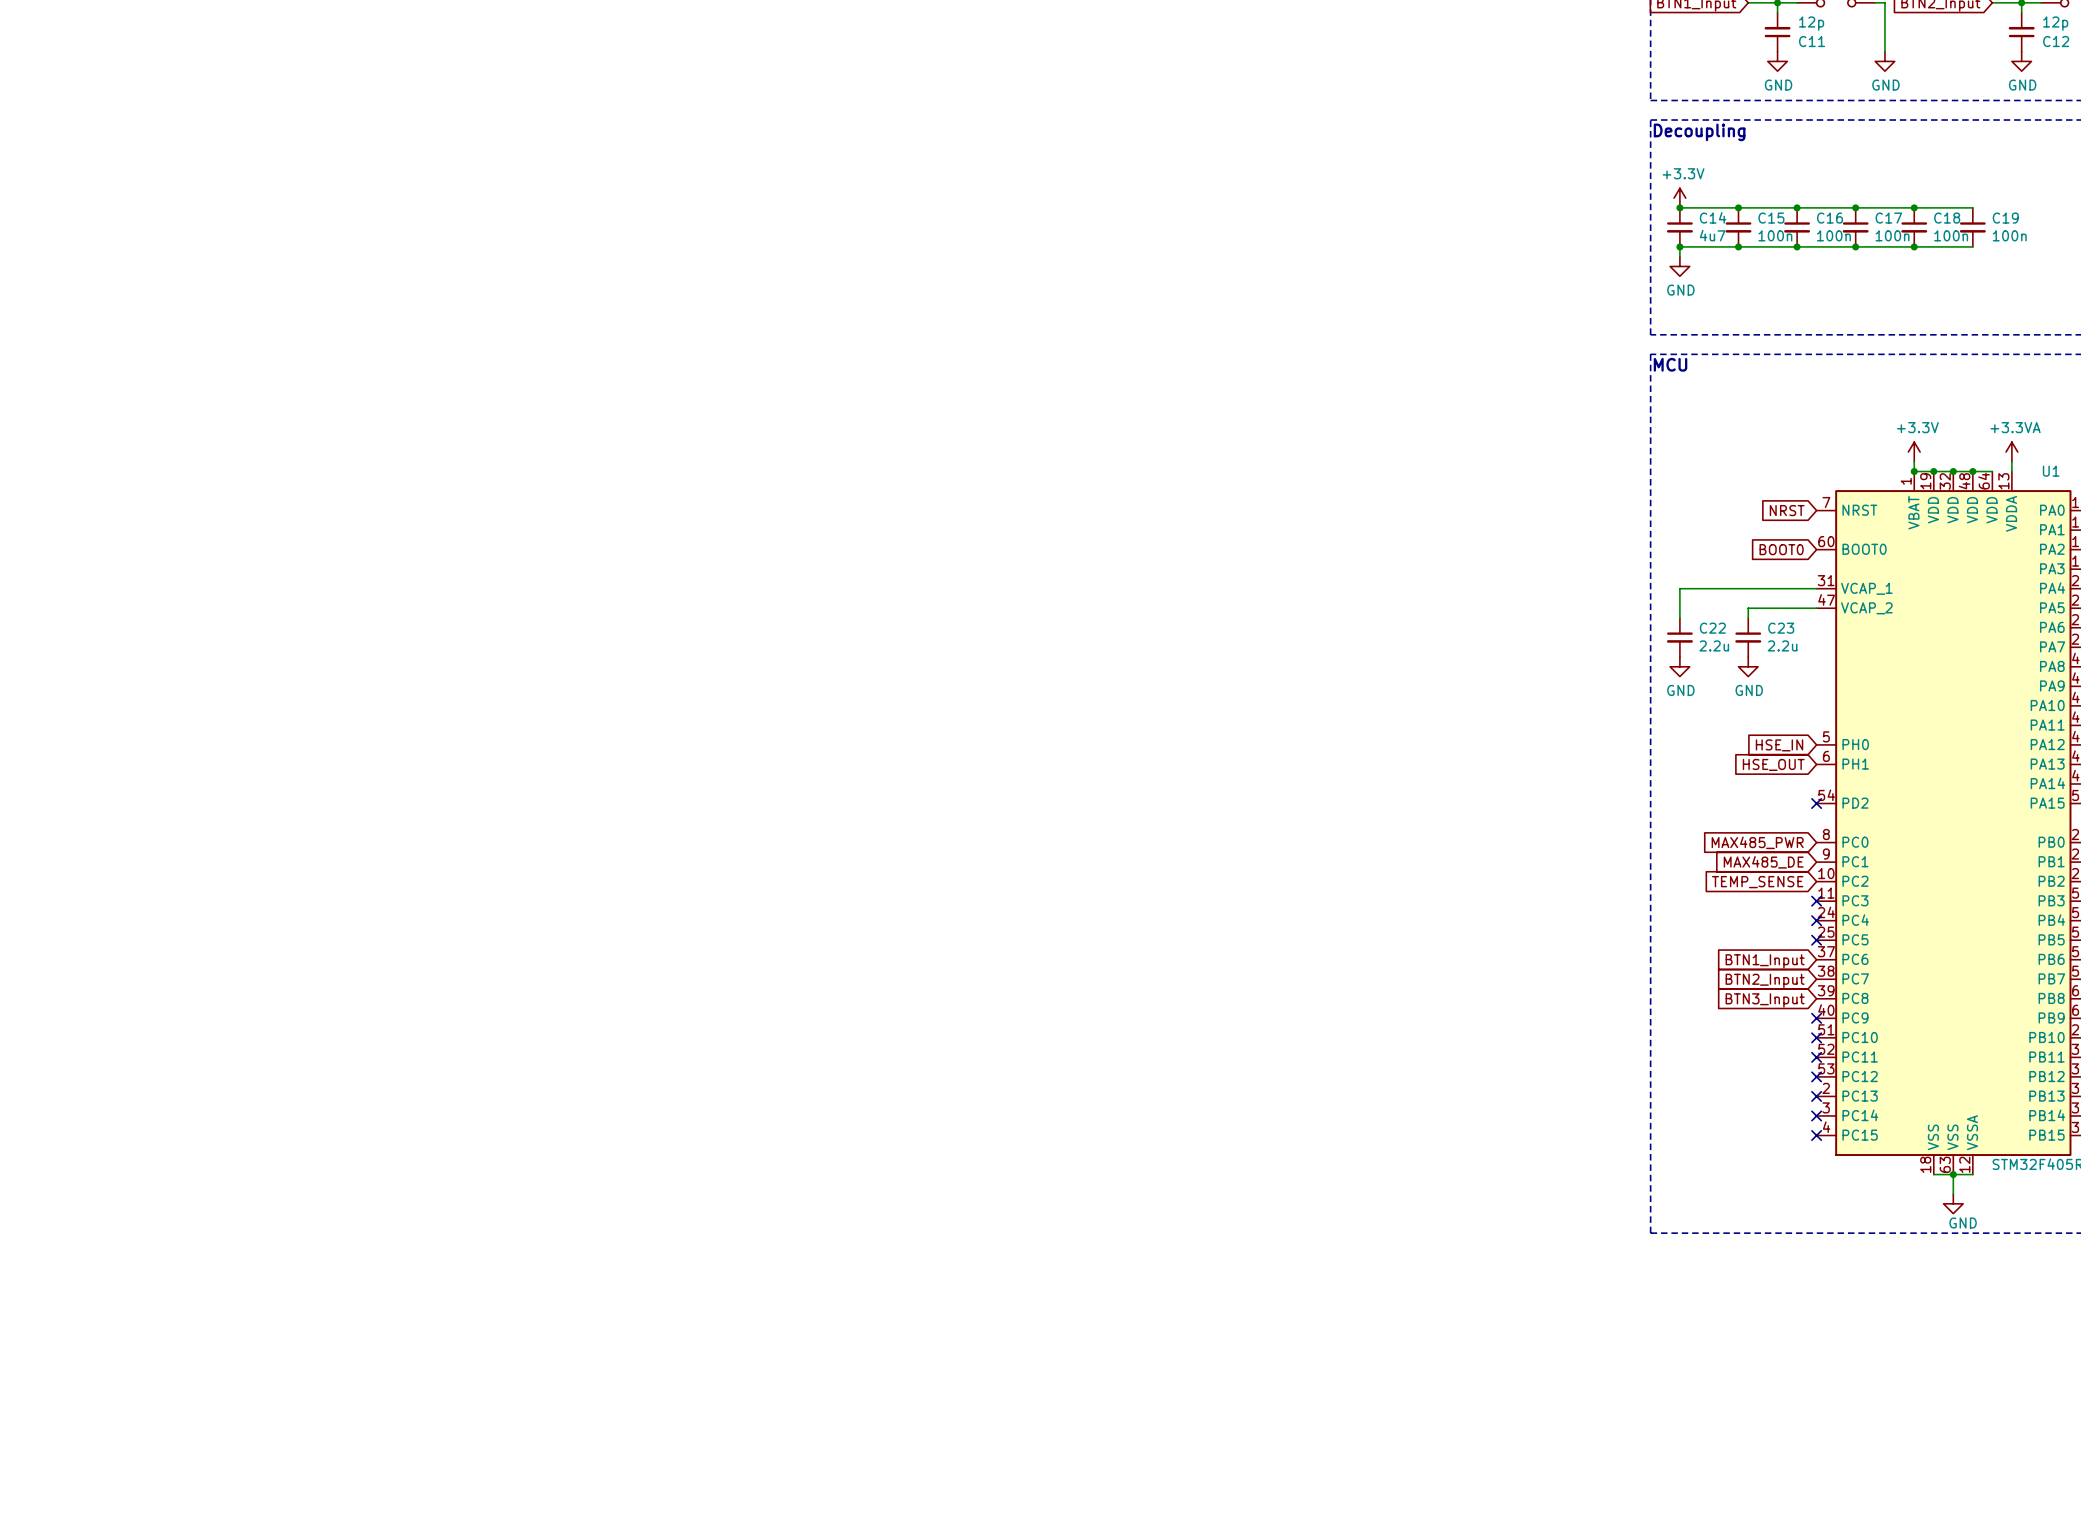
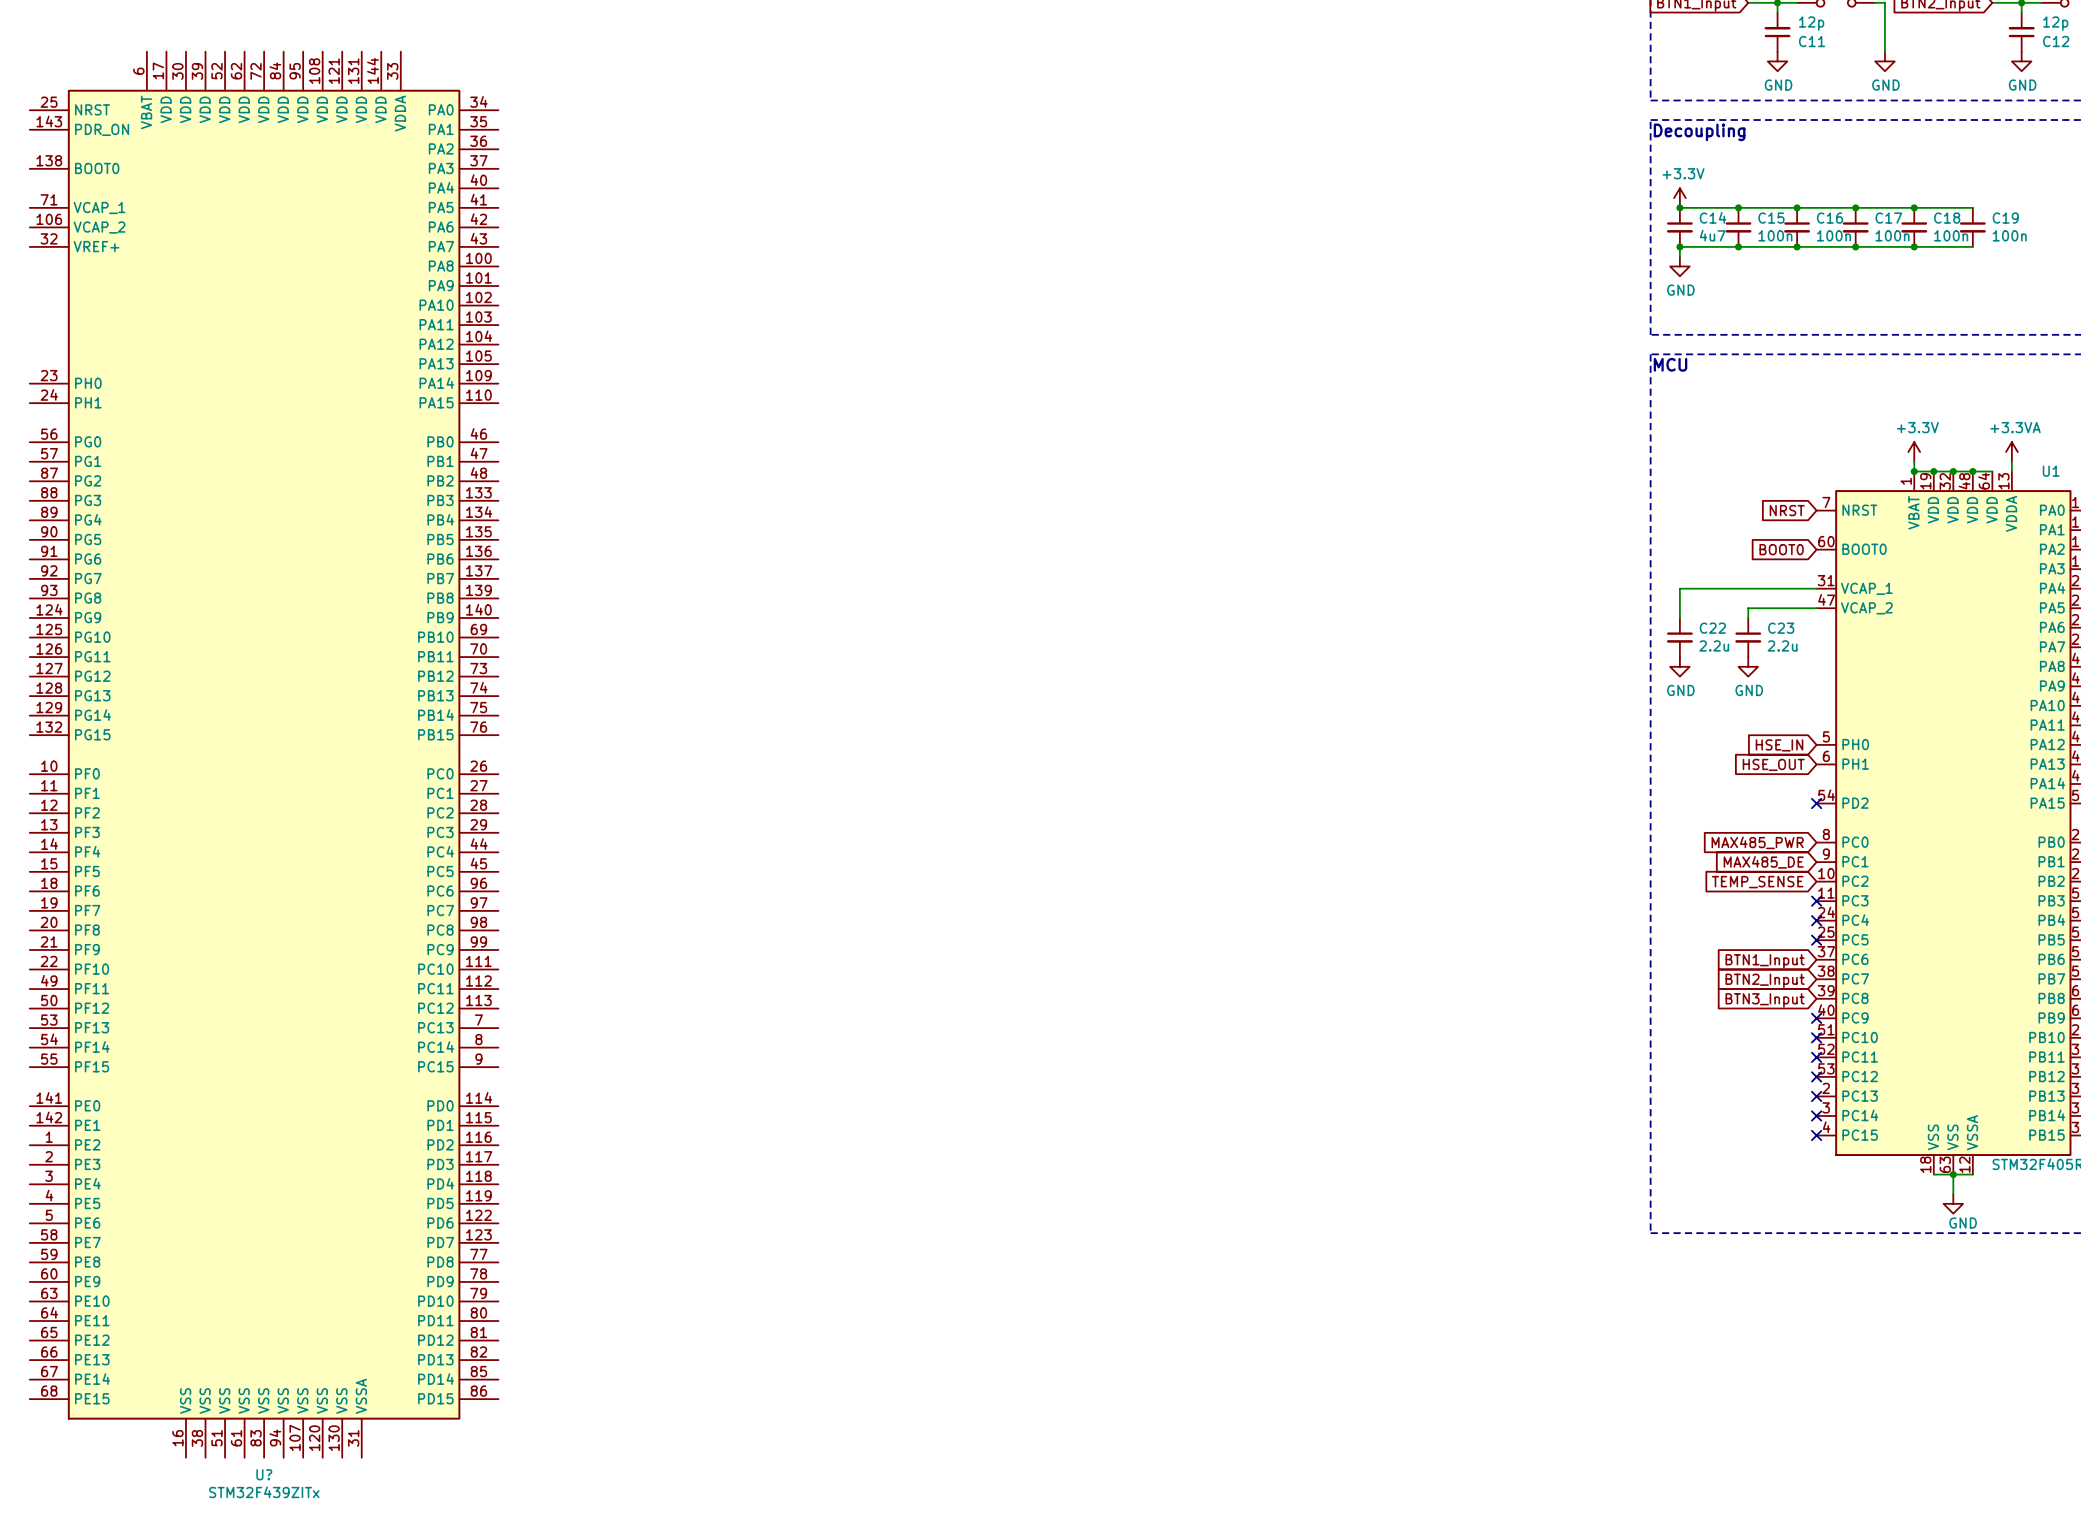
U?: none -> STM32F439ZITx (264, 754)

